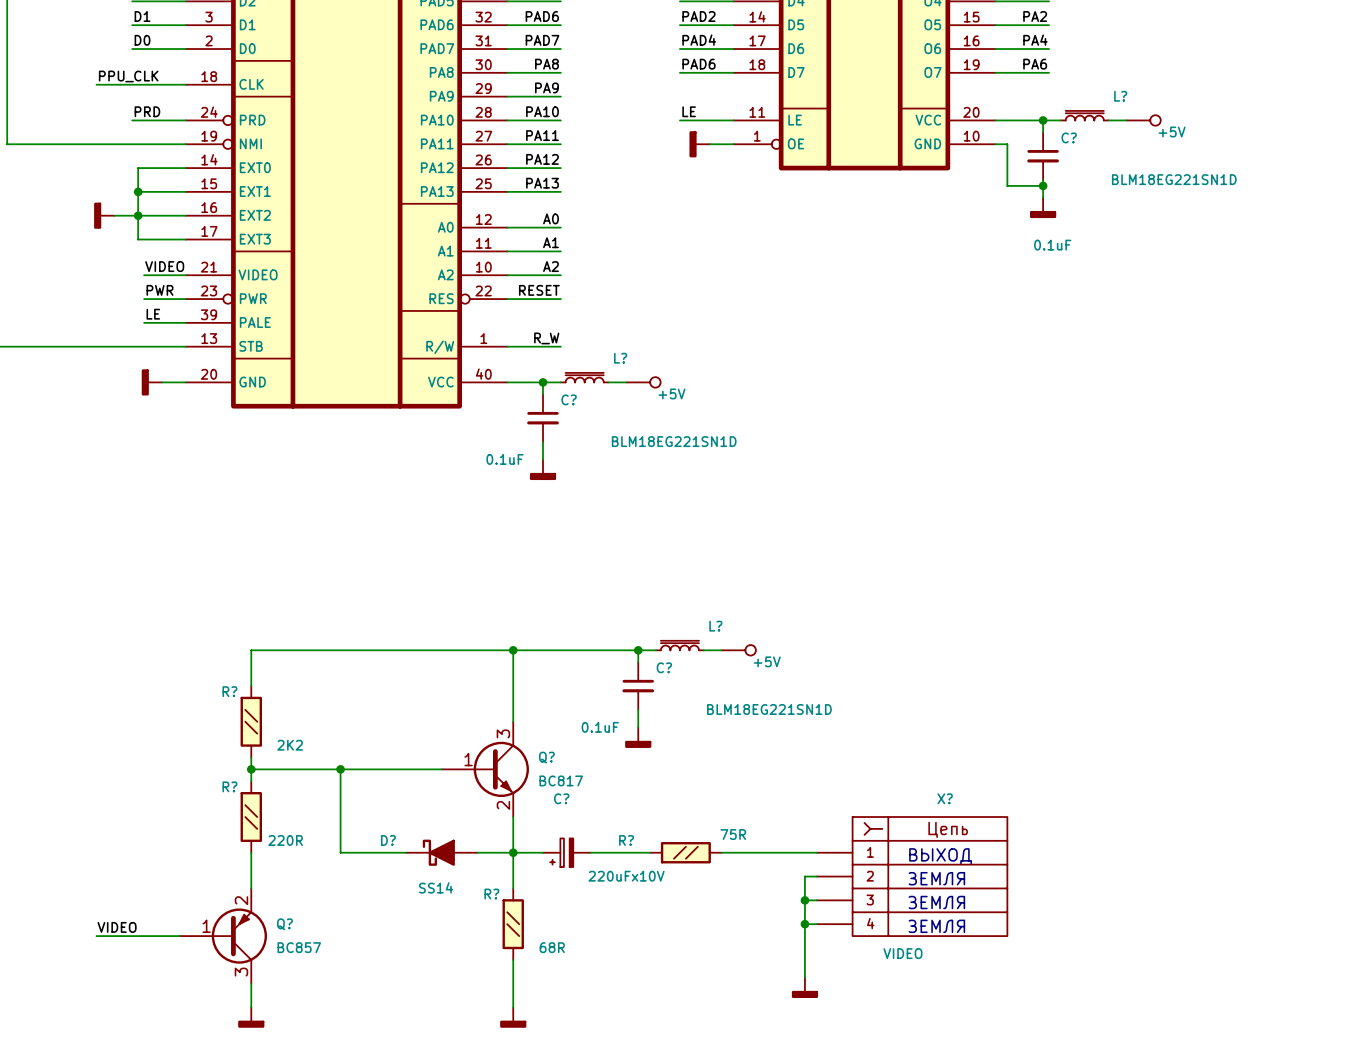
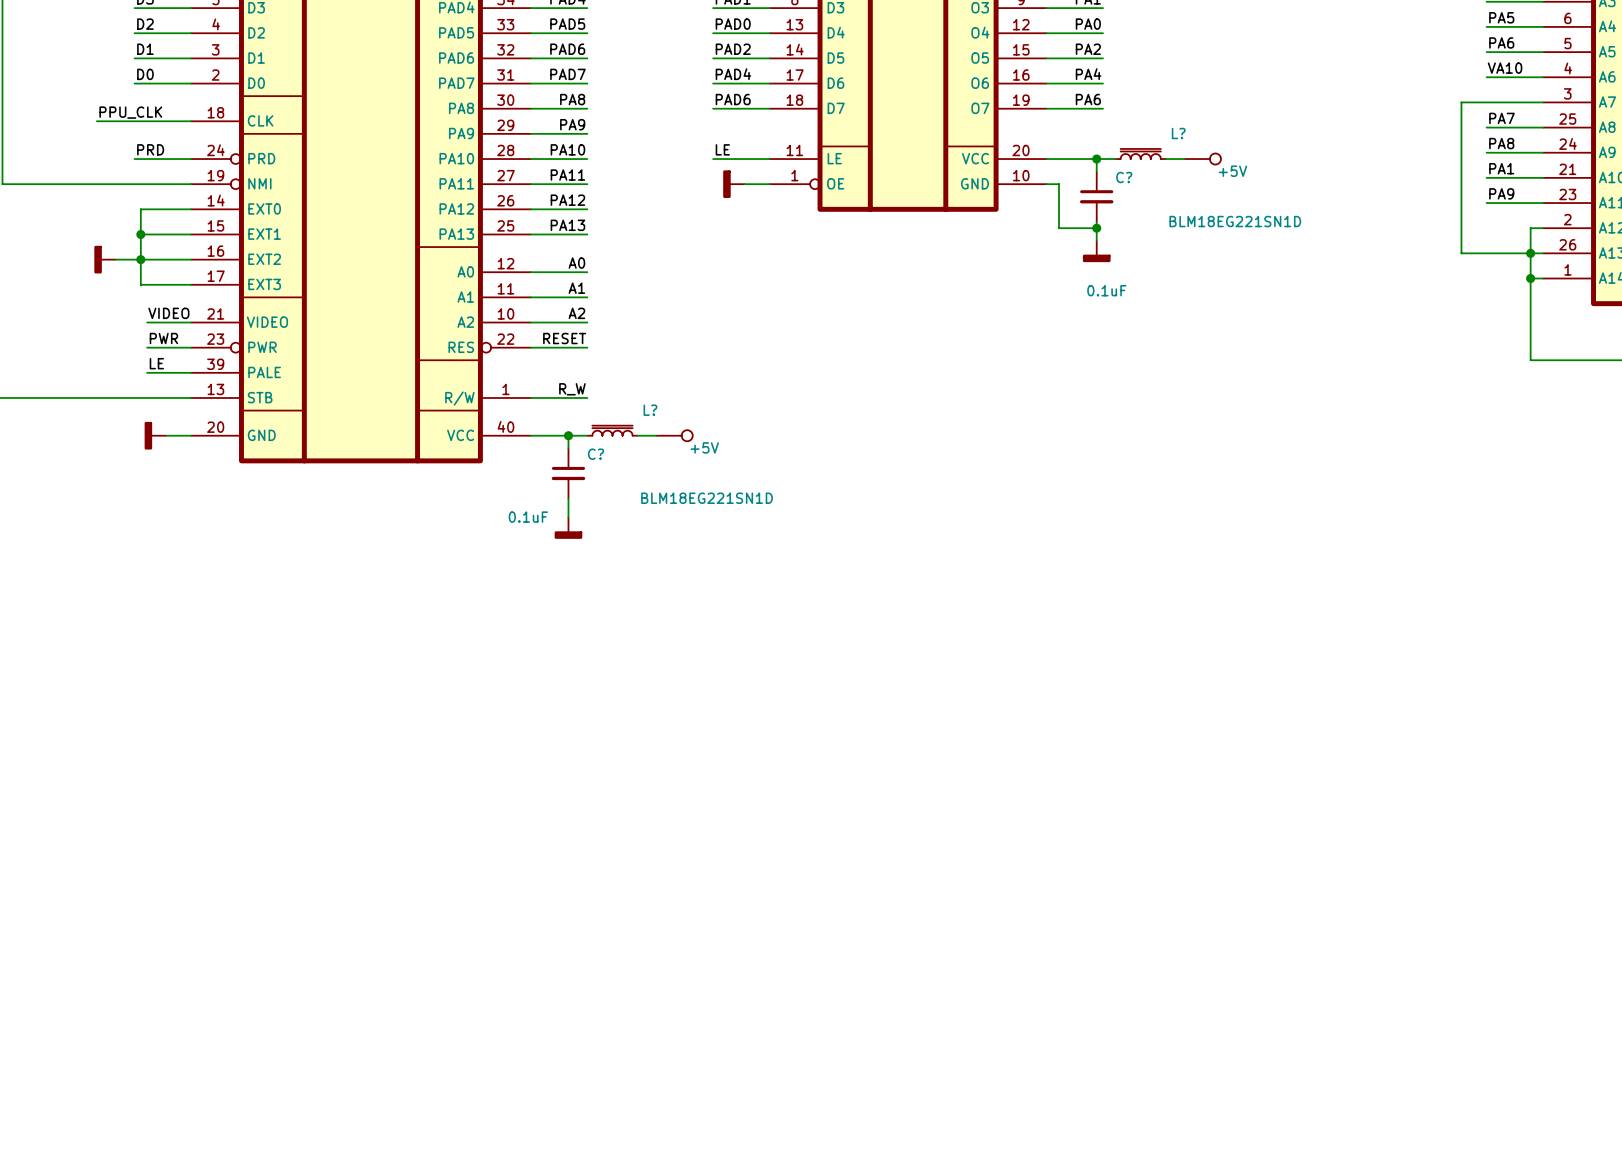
L?: BLM18EG221SN1D (679, 645) -> none
wire: (513, 650) (513, 721) -> none
junction: (513, 650) -> none
wire: (638, 650) (638, 662) -> none
junction: (638, 650) -> none
wire: (656, 650) (251, 650) (251, 686) -> none
wire: (703, 650) (721, 650) -> none
power symbol: +5V (738, 650) -> none
C?: 0.1uF (638, 686) -> none
wire: (638, 709) (638, 727) -> none
R?: 2K2 (251, 721) -> none
power symbol: (638, 737) -> none
wire: (251, 757) (251, 781) -> none
wire: (251, 769) (441, 769) -> none
junction: (251, 769) -> none
wire: (340, 769) (340, 852) (406, 852) -> none
junction: (340, 769) -> none
Q?: BC817 (485, 769) -> none
R?: 220R (251, 817) -> none
wire: (513, 817) (513, 888) -> none
wire: (251, 852) (251, 888) -> none
D?: SS14 (441, 852) -> none
wire: (477, 852) (543, 852) -> none
junction: (513, 852) -> none
C?: 220uFx10V (566, 852) -> none
wire: (590, 852) (650, 852) -> none
R?: 75R (685, 852) -> none
wire: (721, 852) (816, 852) -> none
text: ВЫХОД (940, 856) -> none
wire: (816, 876) (804, 876) (804, 977) -> none
X?: VIDEO (912, 876) -> none
text: ЗЕМЛЯ (936, 878) -> none
wire: (804, 900) (816, 900) -> none
junction: (804, 900) -> none
text: ЗЕМЛЯ (936, 902) -> none
R?: 68R (513, 924) -> none
wire: (804, 924) (816, 924) -> none
junction: (804, 924) -> none
text: ЗЕМЛЯ (936, 926) -> none
label: VIDEO (117, 927) -> none
wire: (96, 936) (179, 936) -> none
Q?: BC857 (223, 936) -> none
wire: (513, 959) (513, 1007) -> none
wire: (251, 983) (251, 1007) -> none
power symbol: (804, 987) -> none
power symbol: (251, 1017) -> none
power symbol: (513, 1017) -> none

